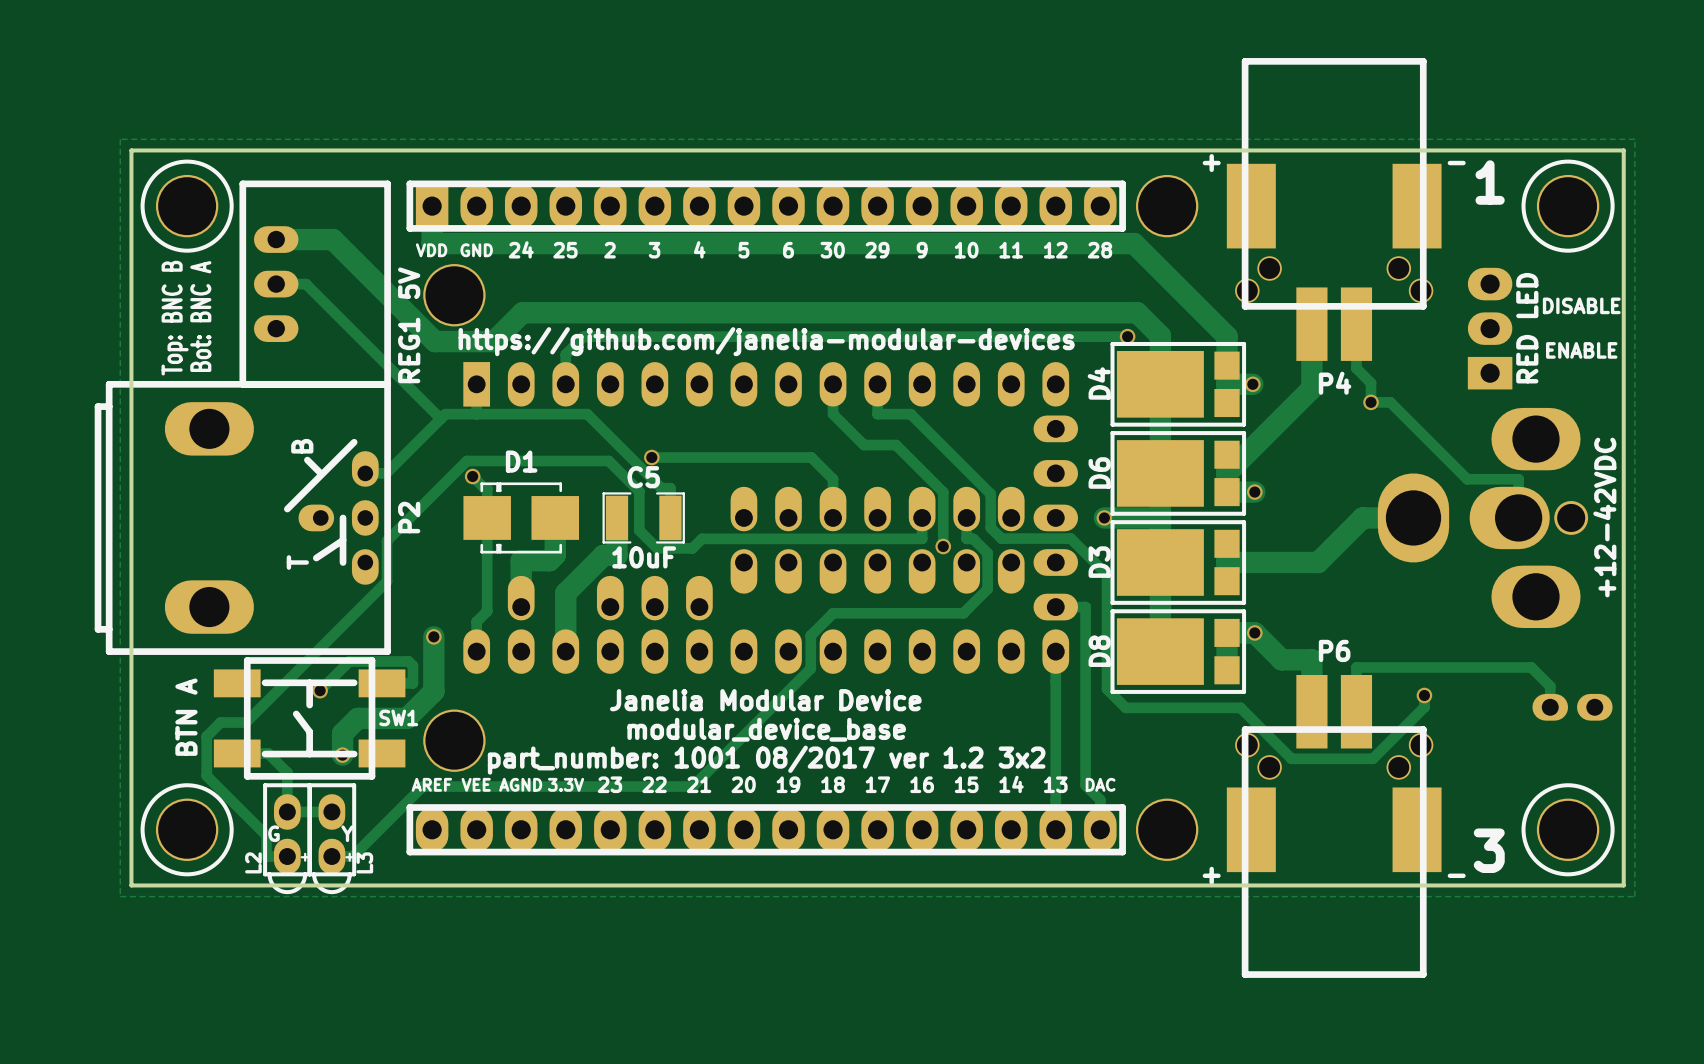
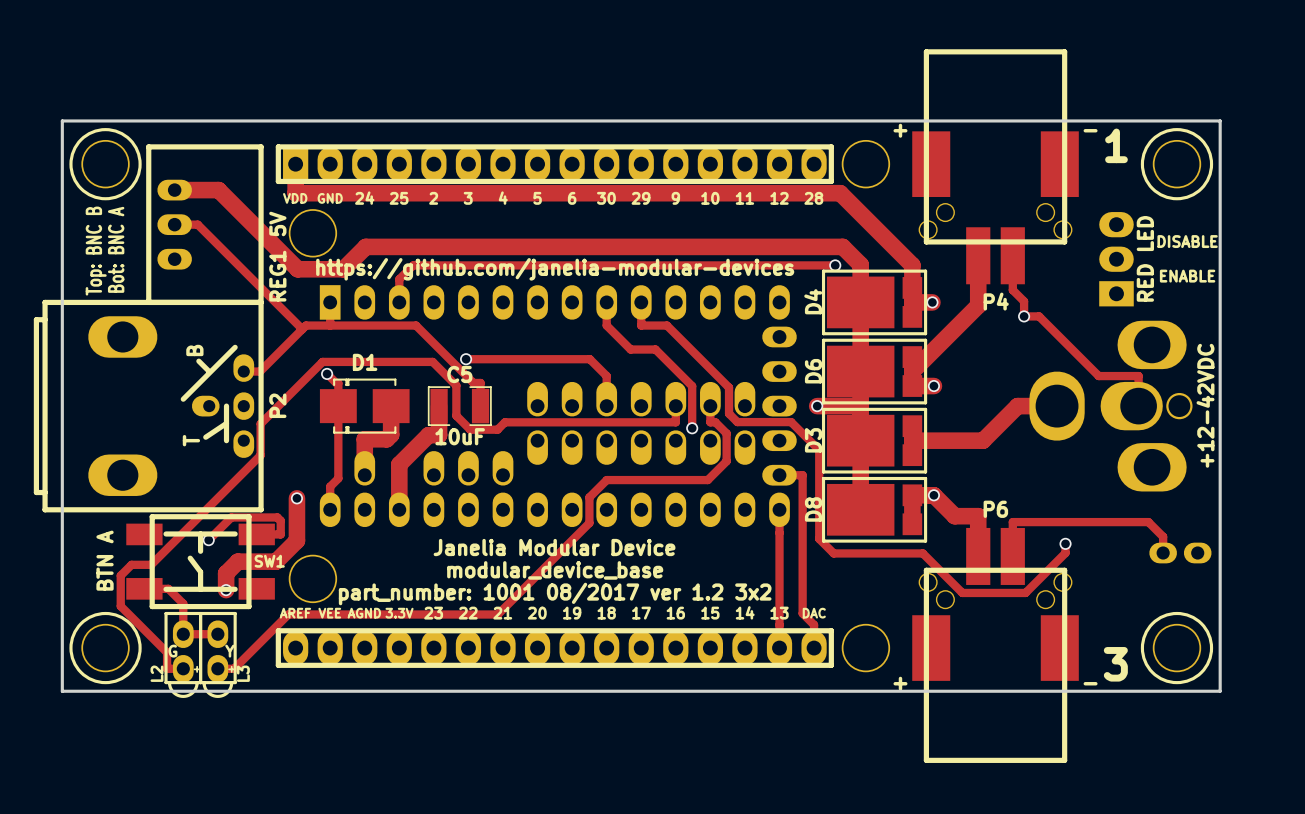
zone outline: (120, 139) (120, 896) (1634, 896) (1634, 139) (120, 139) -> none

